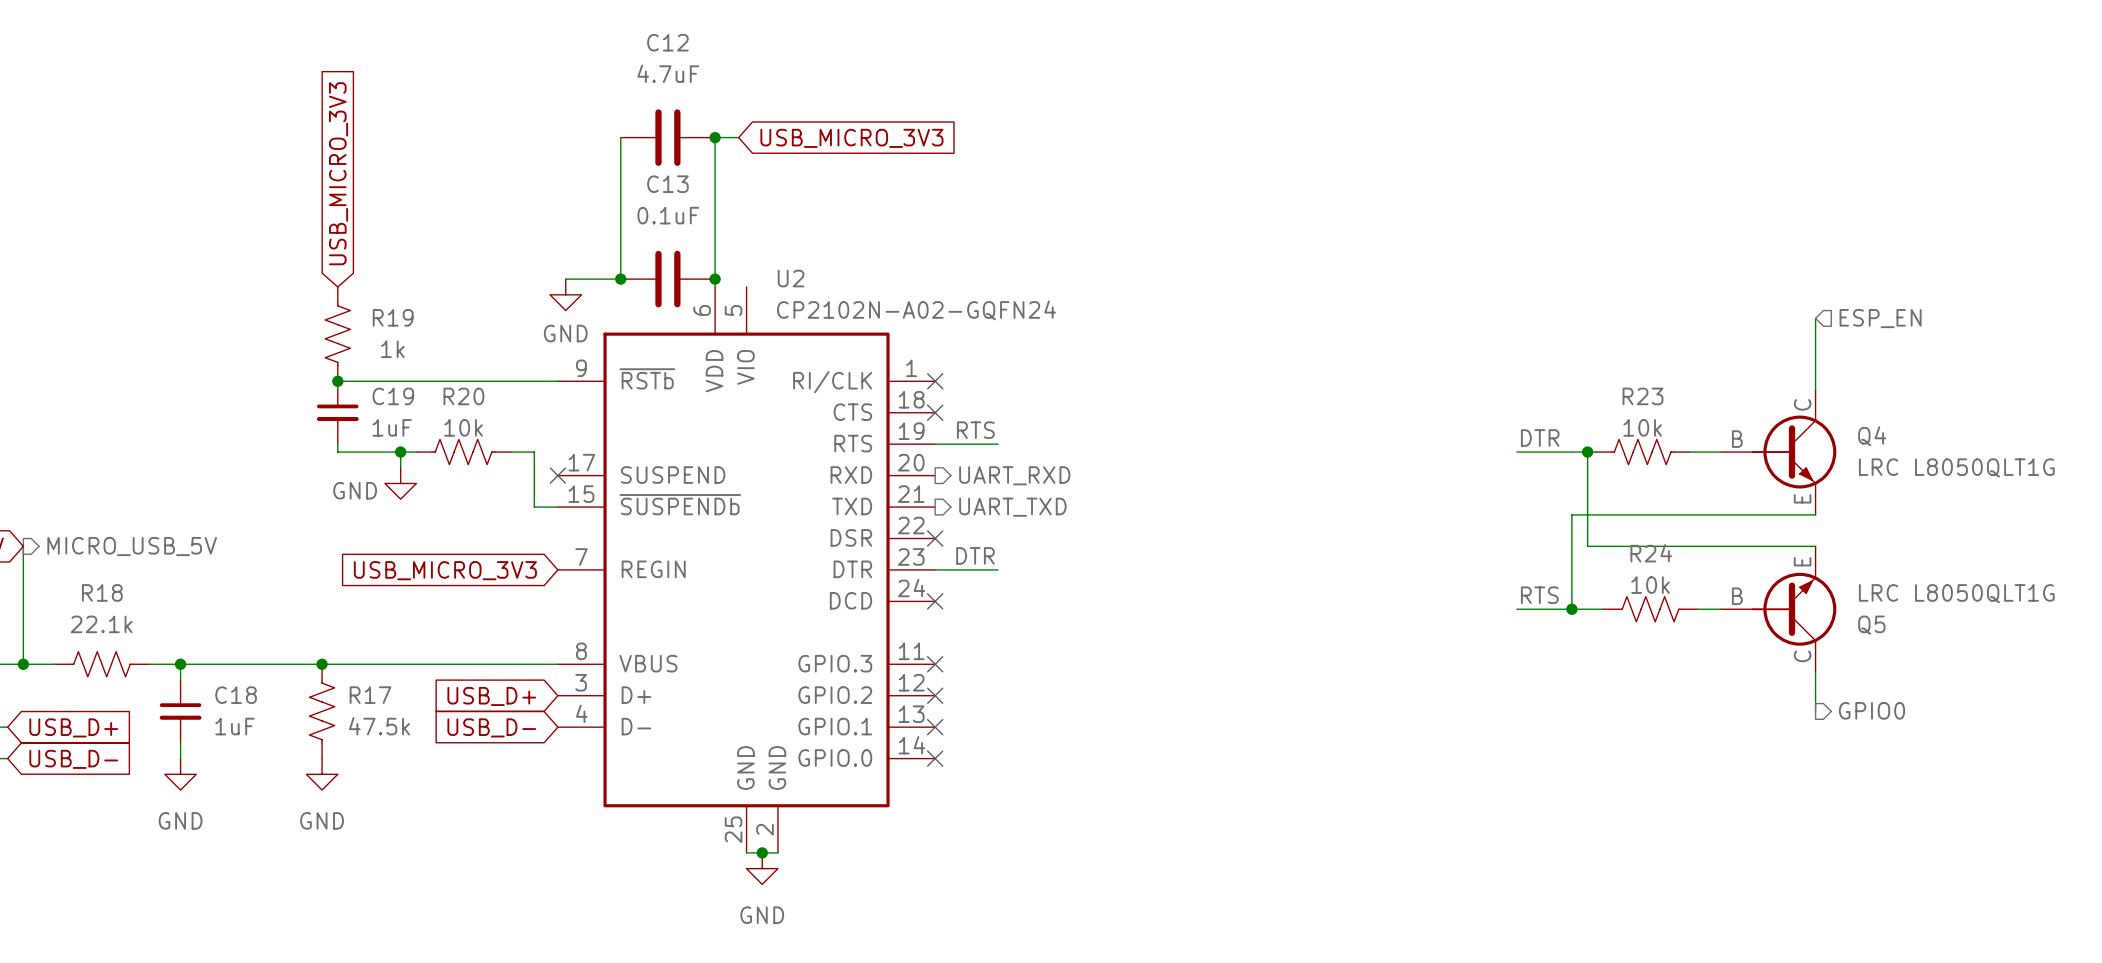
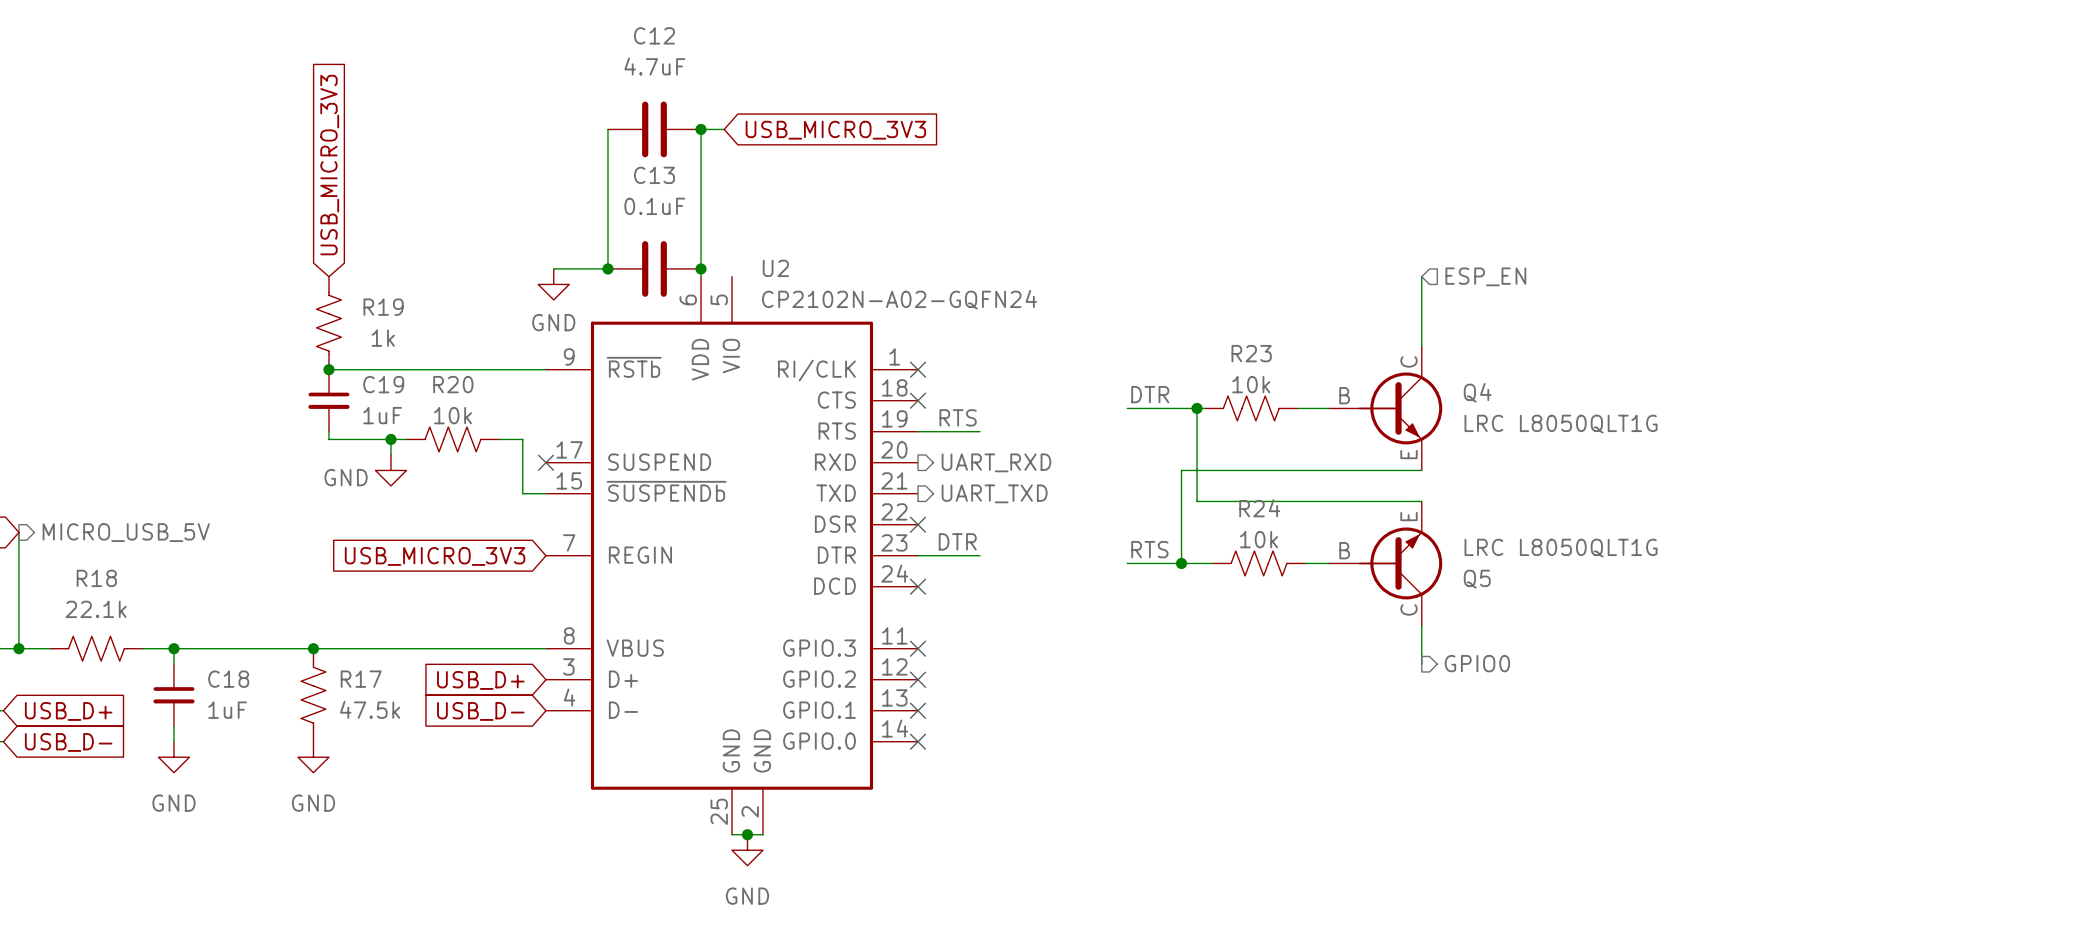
wire: none -> (1421, 276) (1421, 346)
hierarchical label: none -> ESP_EN (1485, 276)
wire: (1815, 318) (1815, 389) -> none
hierarchical label: ESP_EN (1880, 318) -> none
label: none -> DTR (1150, 394)
wire: none -> (1127, 408) (1204, 408)
wire: none -> (1197, 408) (1197, 501) (1421, 501)
junction: none -> (1197, 408)
wire: none -> (1297, 408) (1328, 408)
label: DTR (1540, 438) -> none
wire: (1516, 452) (1595, 452) -> none
wire: (1587, 452) (1587, 546) (1815, 546) -> none
junction: (1587, 452) -> none
R23 position: (1642, 452) -> (1251, 408)
wire: (1689, 452) (1721, 452) -> none
Q4 position: (1778, 452) -> (1385, 408)
wire: none -> (1421, 470) (1181, 470) (1181, 563)
wire: (1815, 514) (1571, 514) (1571, 609) -> none
label: none -> RTS (1149, 549)
wire: none -> (1127, 563) (1212, 563)
junction: none -> (1181, 563)
wire: none -> (1305, 563) (1328, 563)
label: RTS (1539, 595) -> none
wire: (1516, 609) (1603, 609) -> none
junction: (1571, 609) -> none
R24 position: (1650, 609) -> (1259, 563)
wire: (1697, 609) (1721, 609) -> none
Q5 position: (1778, 609) -> (1385, 563)
wire: none -> (1421, 625) (1421, 664)
wire: (1815, 672) (1815, 711) -> none
hierarchical label: none -> GPIO0 (1477, 663)
hierarchical label: GPIO0 (1871, 710) -> none

